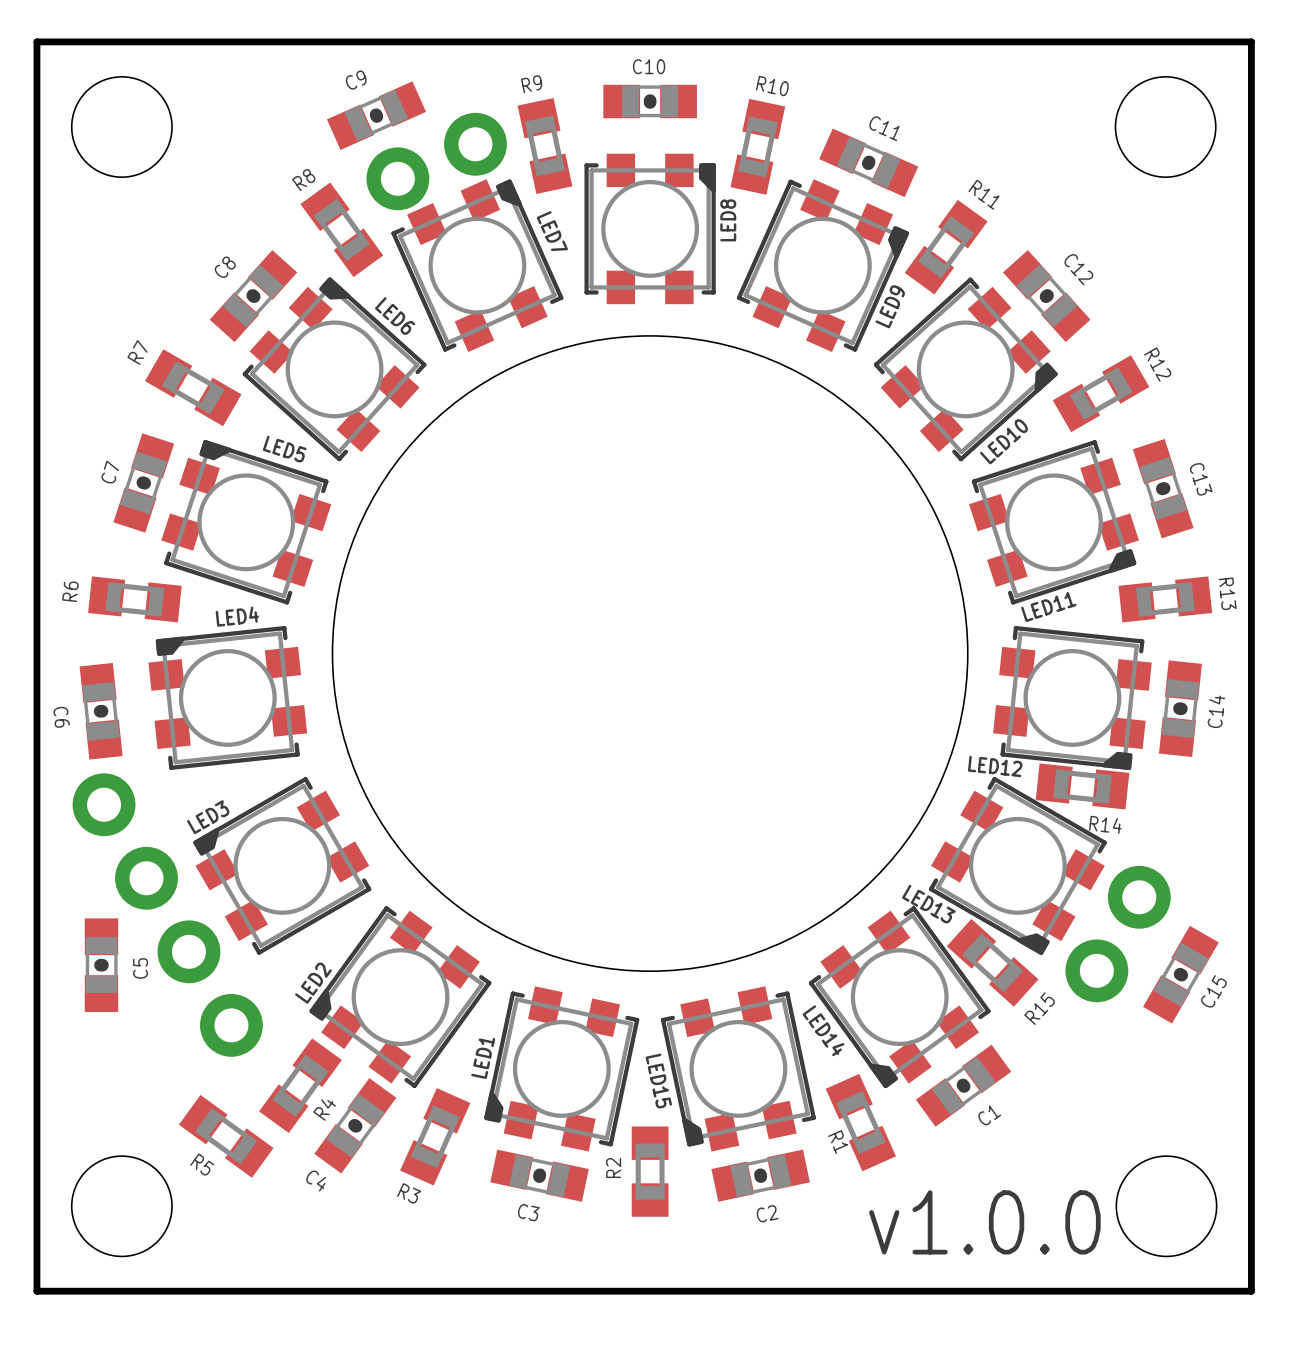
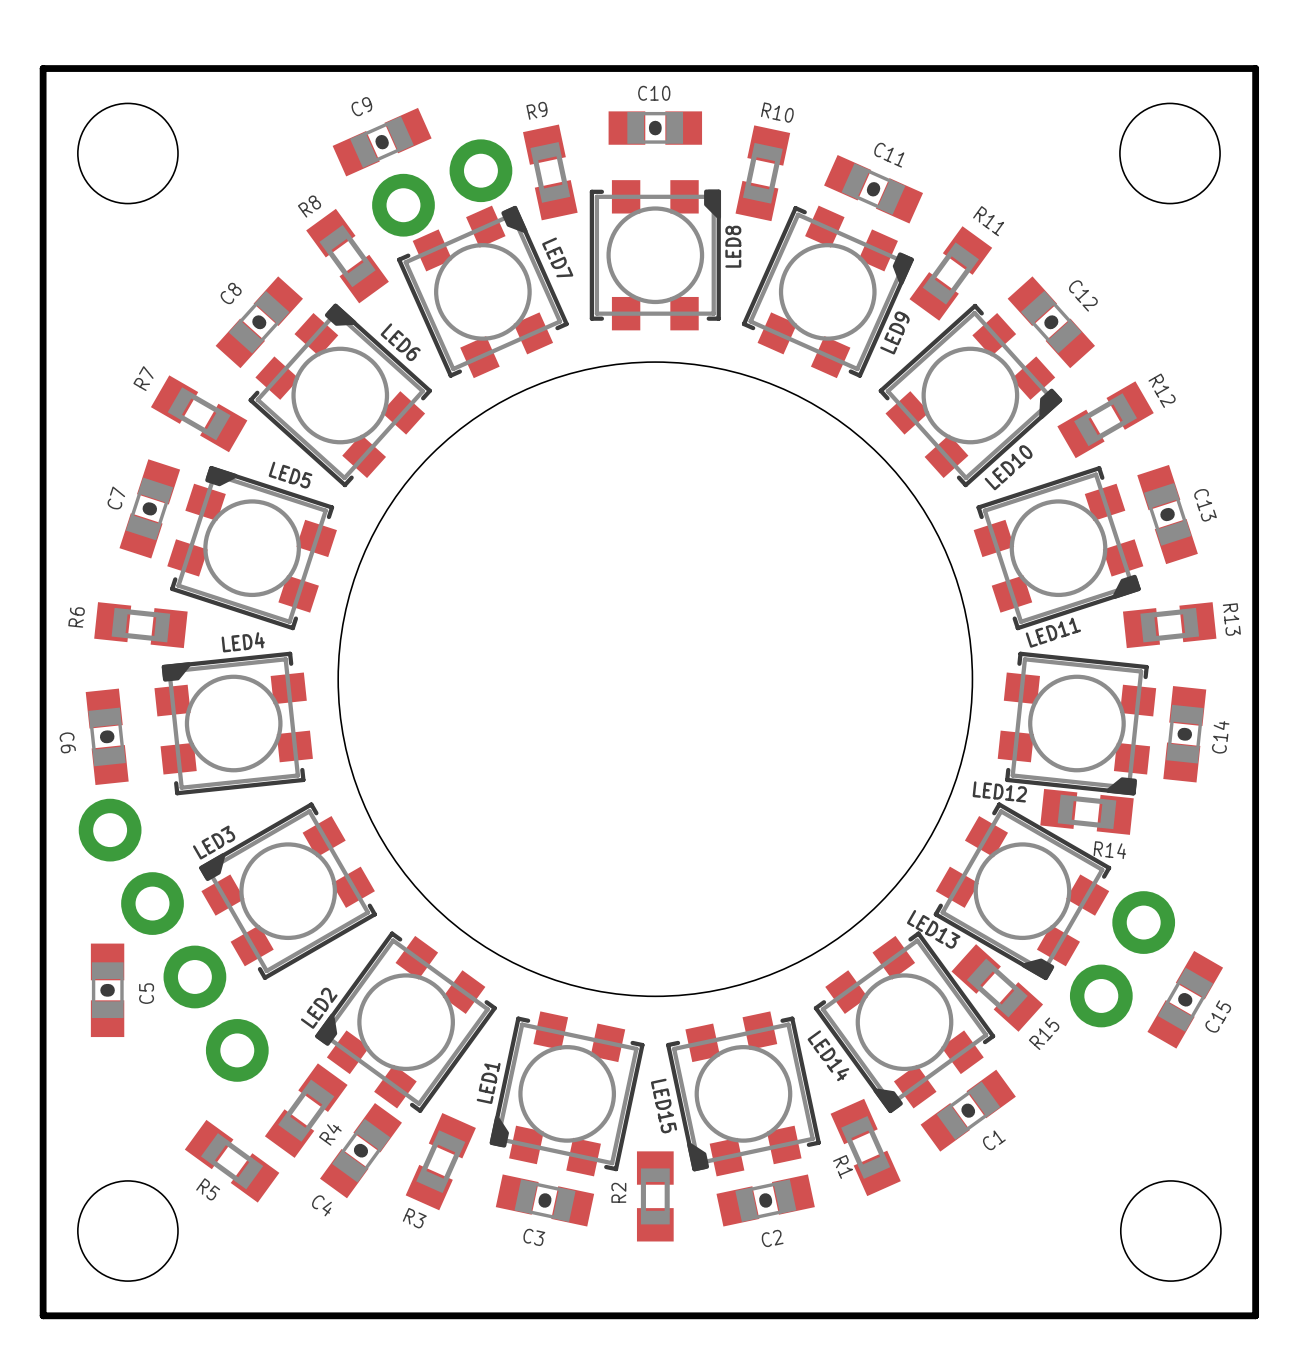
text: v1.0.0 (984, 1222) -> none

